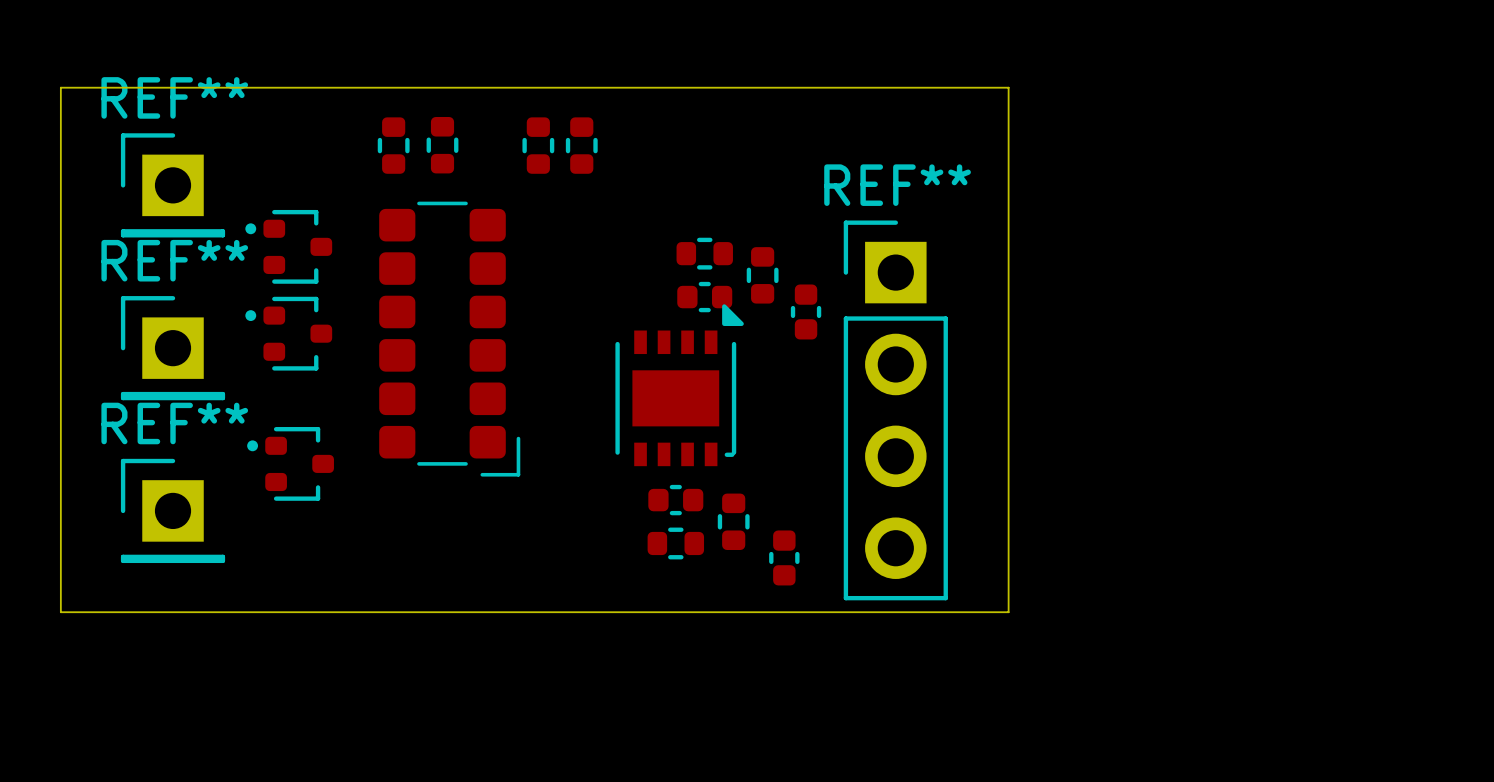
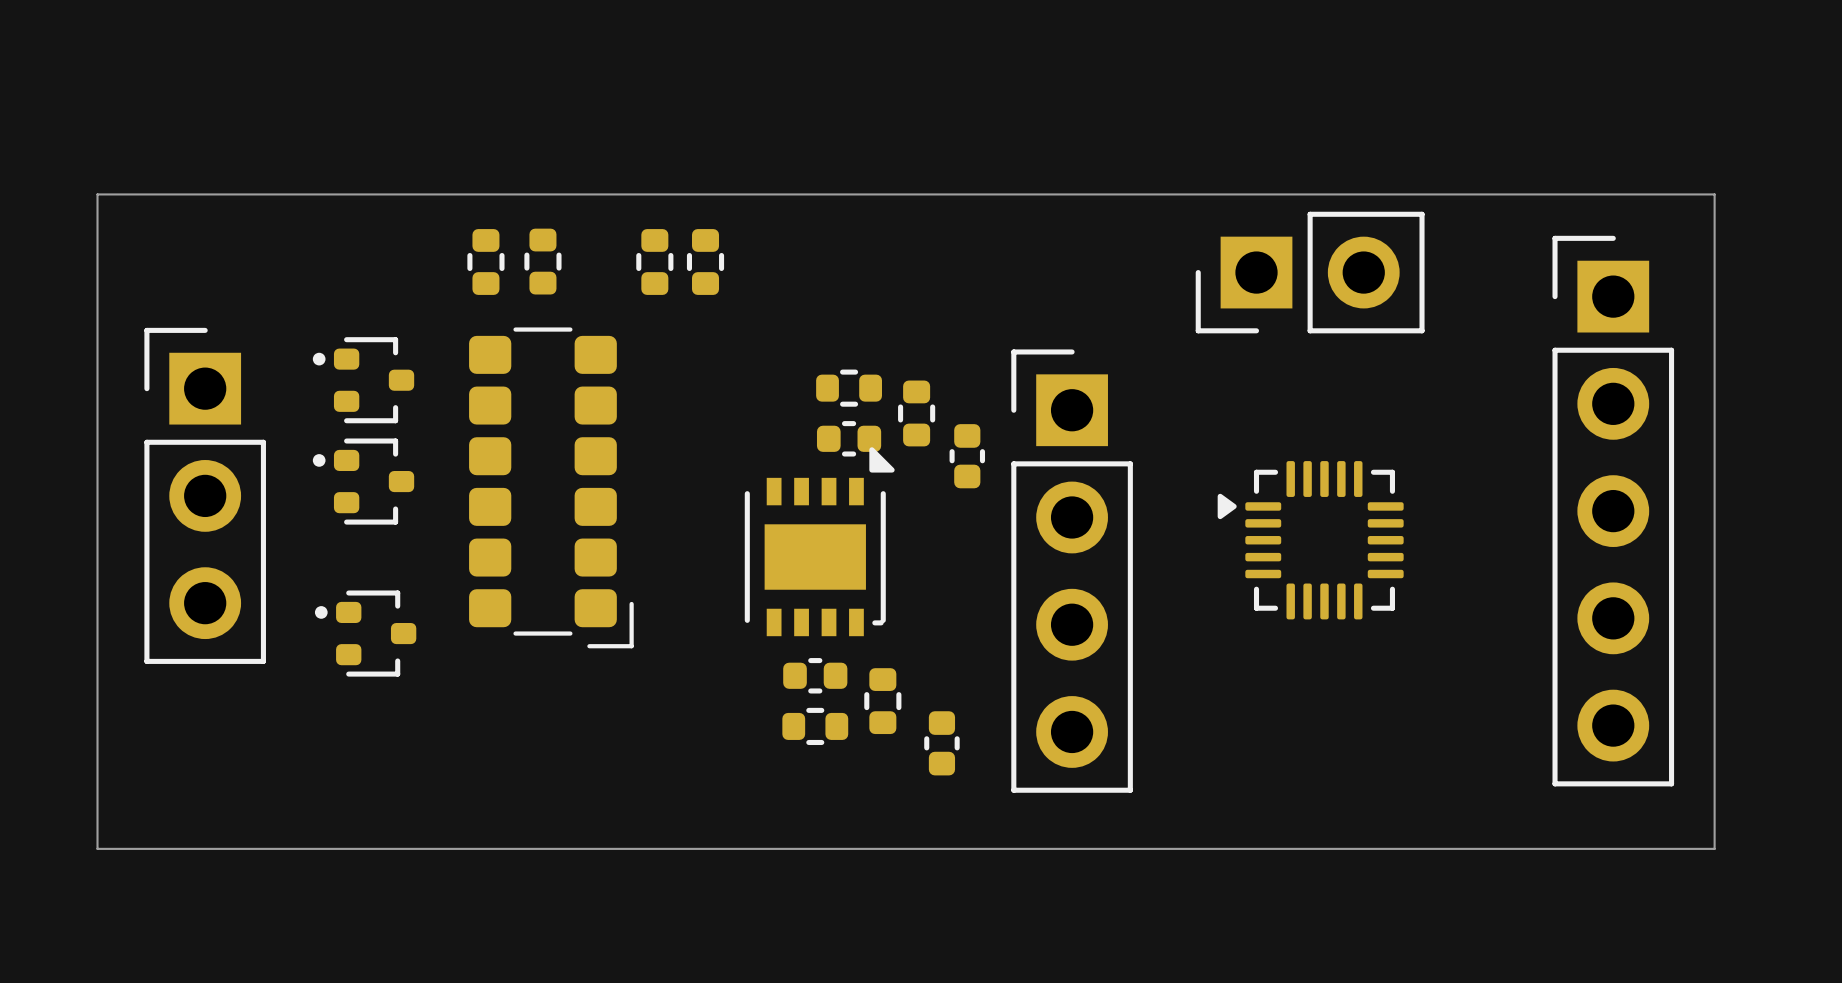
board edge: (1008, 87) (1008, 612) (60, 612) -> (1203, 194) (1714, 194) (1714, 848) (97, 848) (97, 806)
part: none -> (1310, 272)
REF**: (173, 185) -> none
REF** name: REF** (897, 185) -> none
part: none -> (205, 495)
REF**: (173, 348) -> none
part: none -> (1613, 511)
part: none -> (1310, 540)
REF**: (173, 510) -> none

